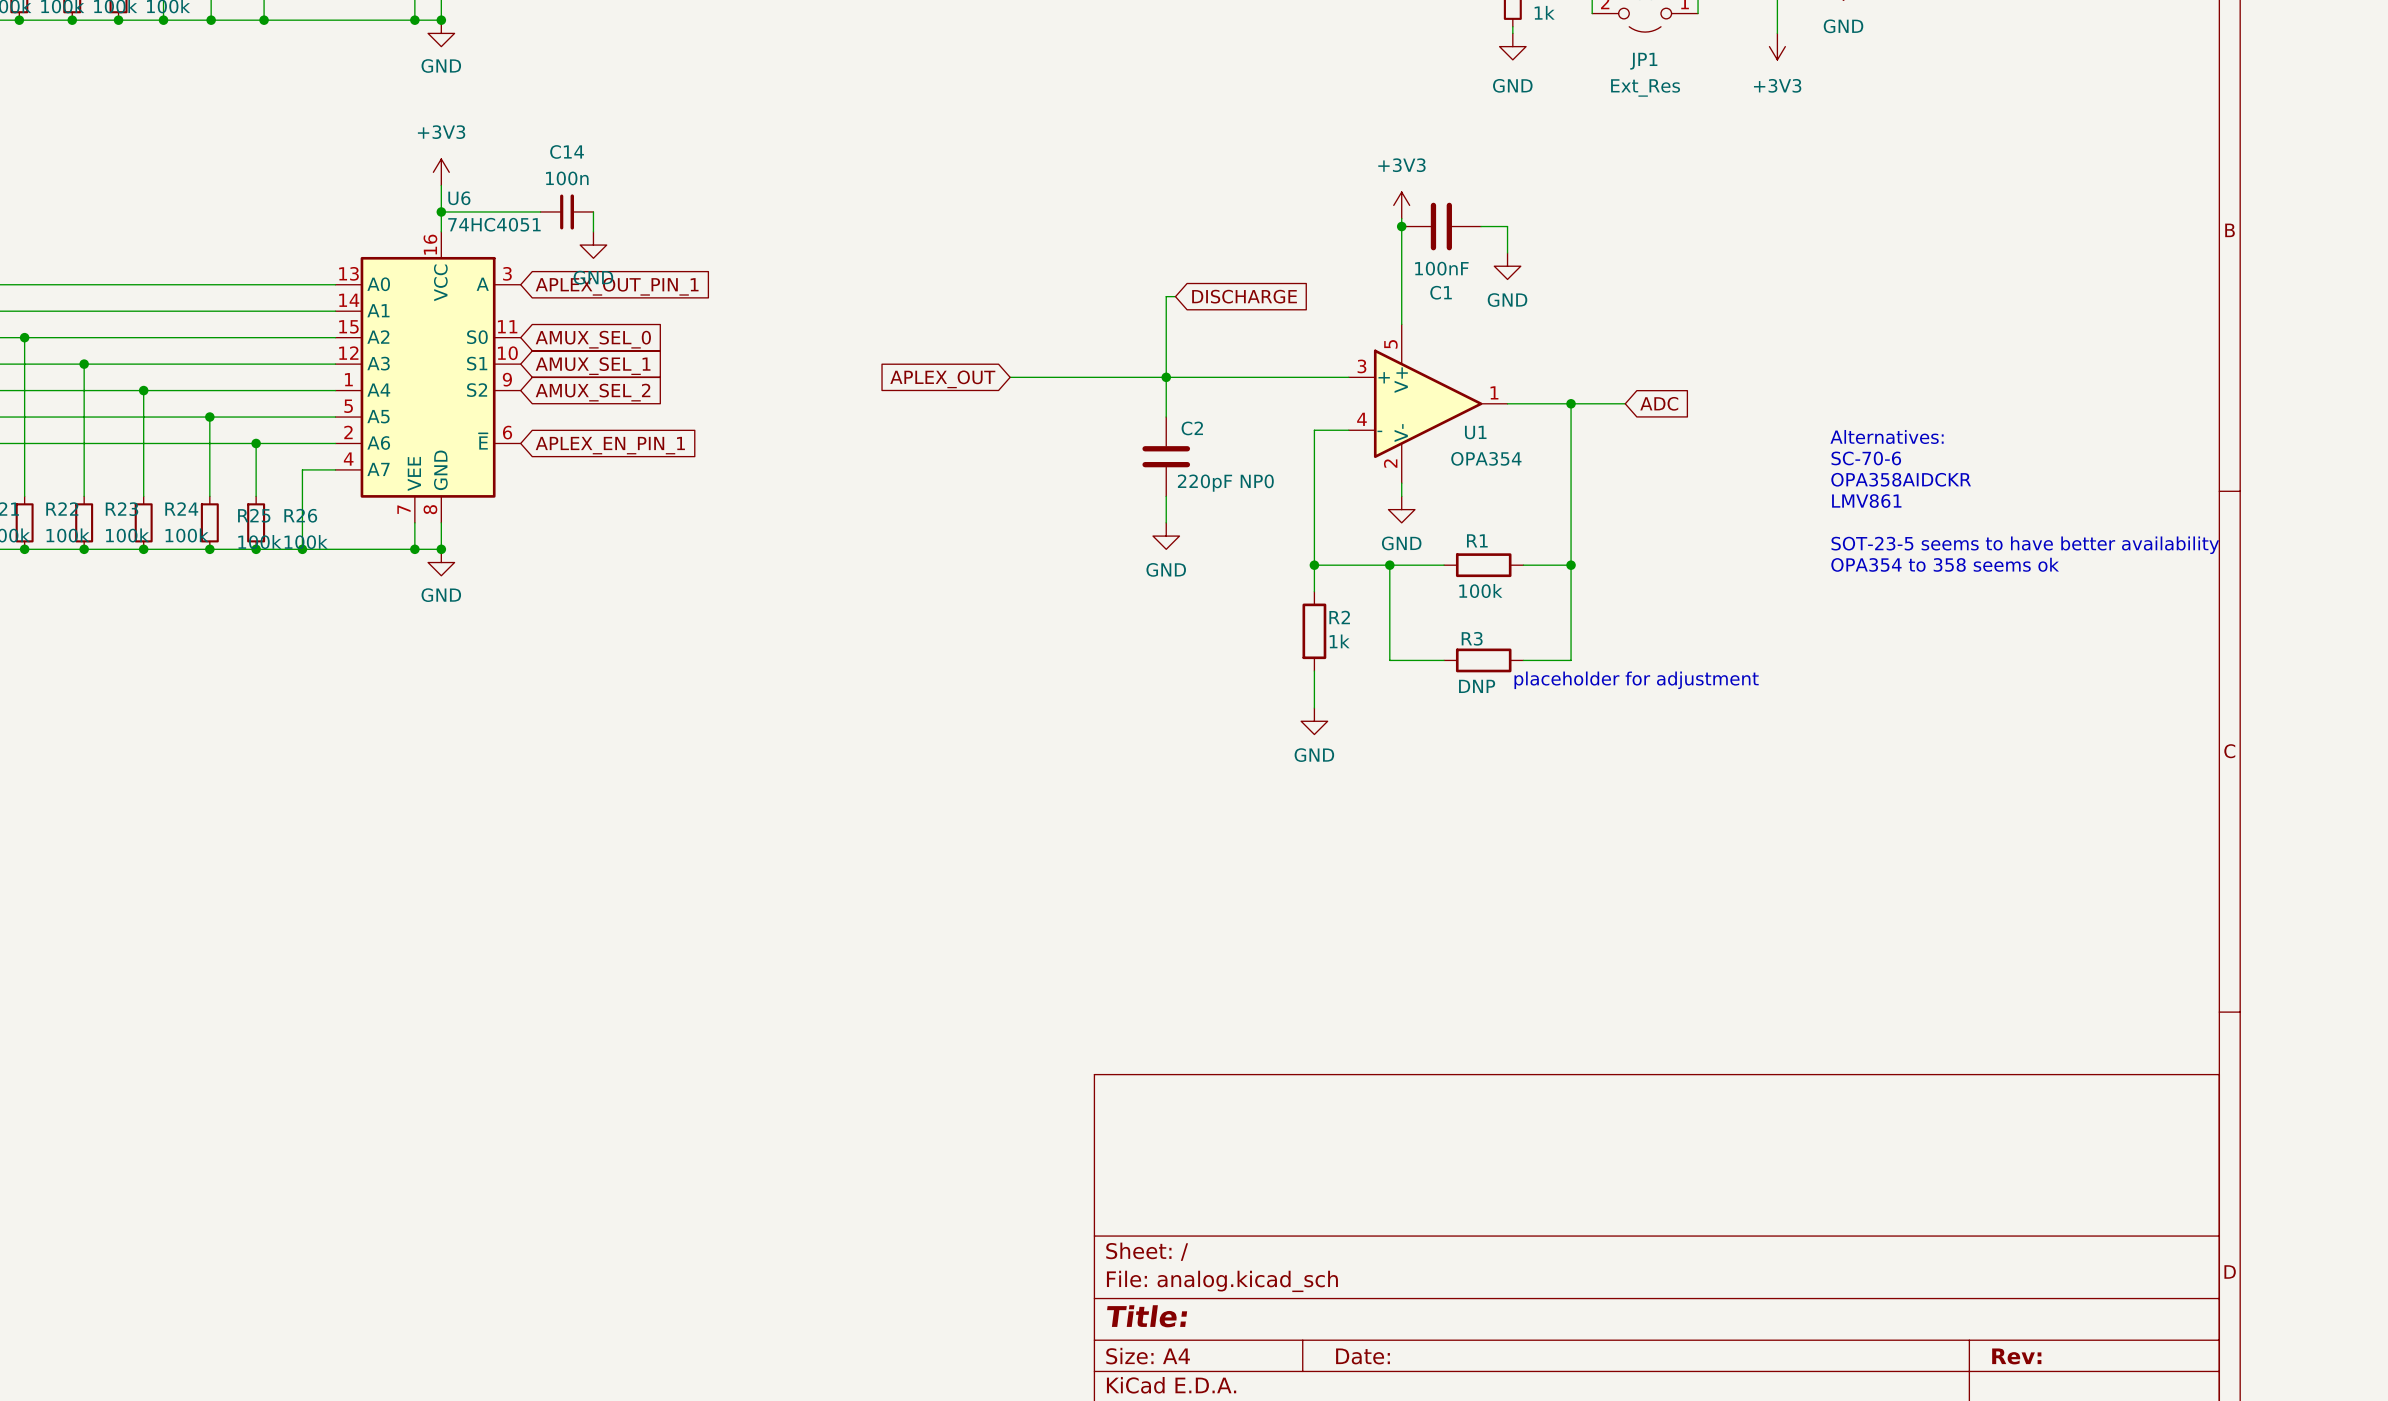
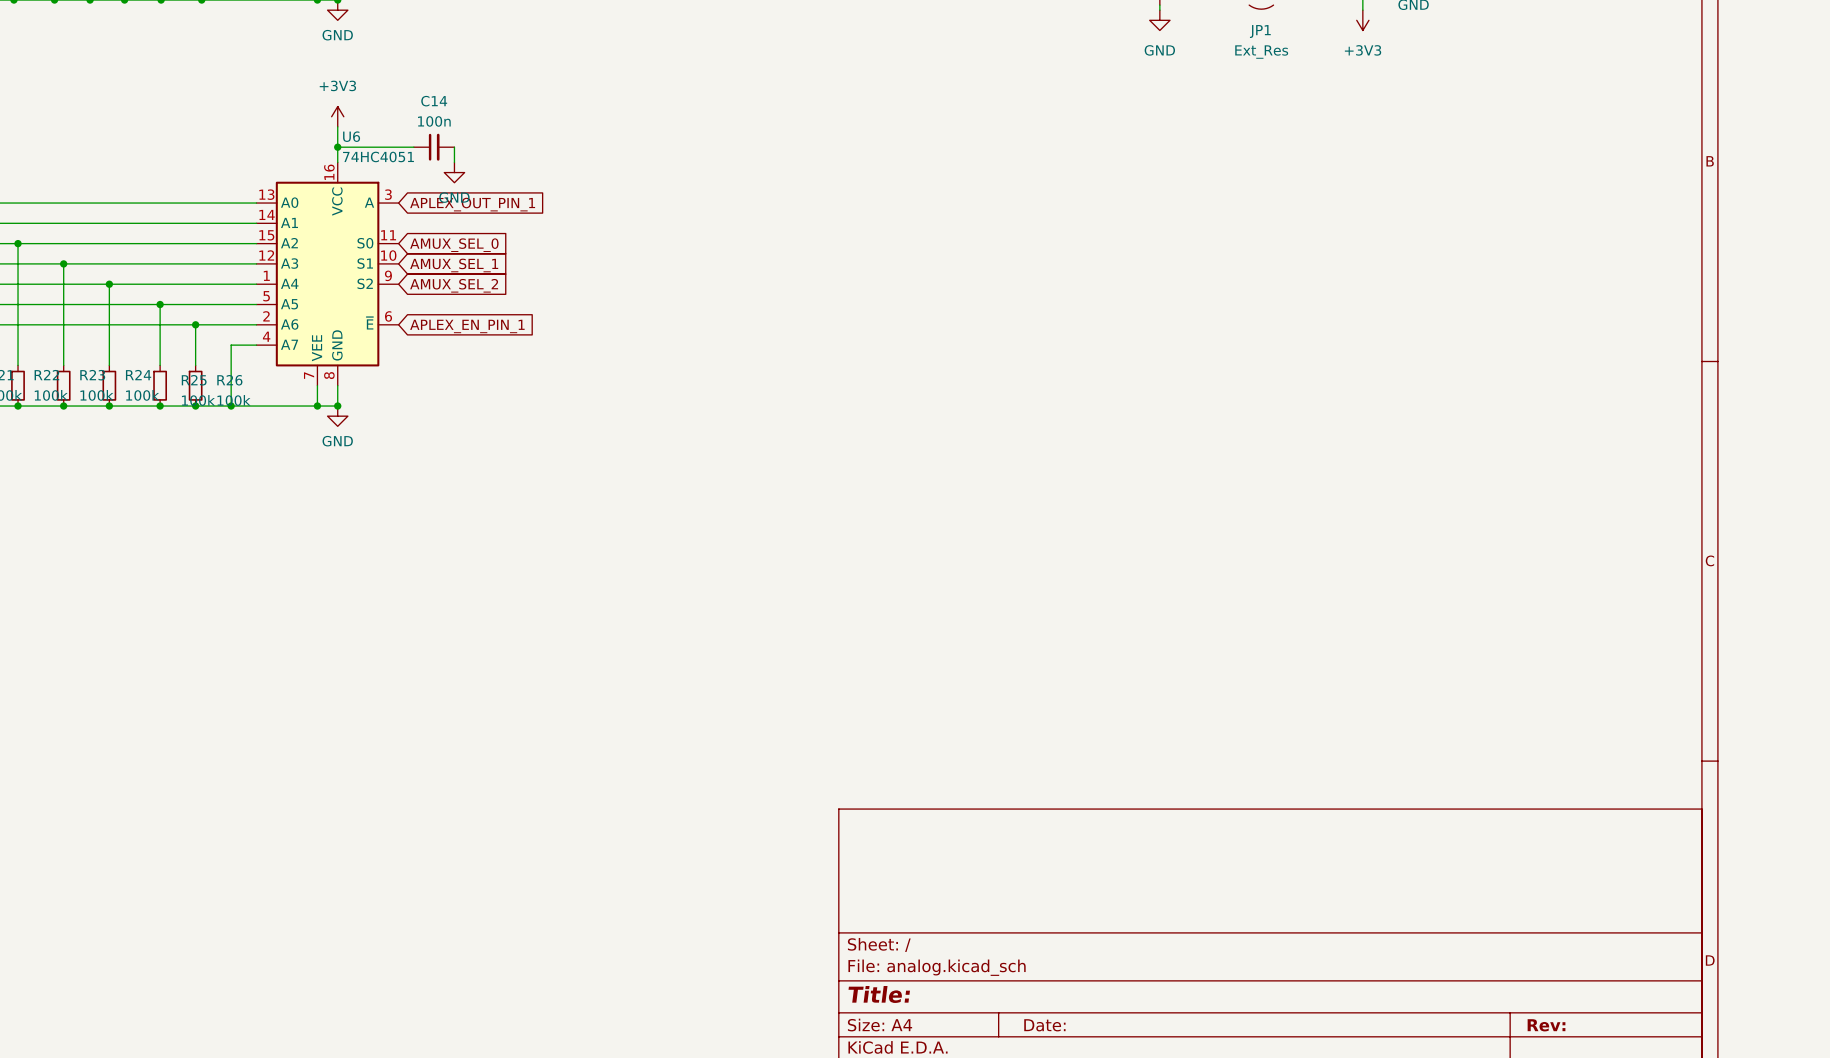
power symbol: +3V3 (1401, 205) -> none
wire: (1401, 218) (1401, 324) -> none
junction: (1401, 226) -> none
C1: 100nF (1441, 226) -> none
wire: (1481, 226) (1507, 226) (1507, 252) -> none
power symbol: GND (1507, 266) -> none
wire: (1175, 296) (1166, 296) (1166, 417) -> none
global label: DISCHARGE (1244, 296) -> none
wire: (1010, 377) (1348, 377) -> none
junction: (1166, 377) -> none
global label: APLEX_OUT (942, 379) -> none
U1: OPA354 (1428, 403) -> none
wire: (1507, 403) (1625, 403) -> none
wire: (1571, 403) (1571, 660) (1523, 660) -> none
junction: (1571, 403) -> none
global label: ADC (1659, 403) -> none
wire: (1348, 430) (1314, 430) (1314, 591) -> none
text: Alternatives: (1887, 436) -> none
C2: 220pF NP0 (1166, 456) -> none
text: SC-70-6 (1866, 458) -> none
text: OPA358AIDCKR (1901, 479) -> none
wire: (1401, 483) (1401, 496) -> none
wire: (1166, 496) (1166, 522) -> none
text: LMV861 (1866, 501) -> none
power symbol: GND (1401, 509) -> none
power symbol: GND (1166, 536) -> none
text: SOT-23-5 seems to have better availability (2025, 545) -> none
text: OPA354 to 358 seems ok (1945, 564) -> none
wire: (1314, 565) (1444, 565) -> none
junction: (1314, 565) -> none
wire: (1389, 565) (1389, 660) (1444, 660) -> none
junction: (1389, 565) -> none
R1: 100k (1483, 565) -> none
wire: (1523, 565) (1571, 565) -> none
junction: (1571, 565) -> none
R2: 1k (1314, 631) -> none
R3: DNP (1483, 660) -> none
wire: (1314, 671) (1314, 708) -> none
text: placeholder for adjustment (1636, 680) -> none
power symbol: GND (1314, 721) -> none

